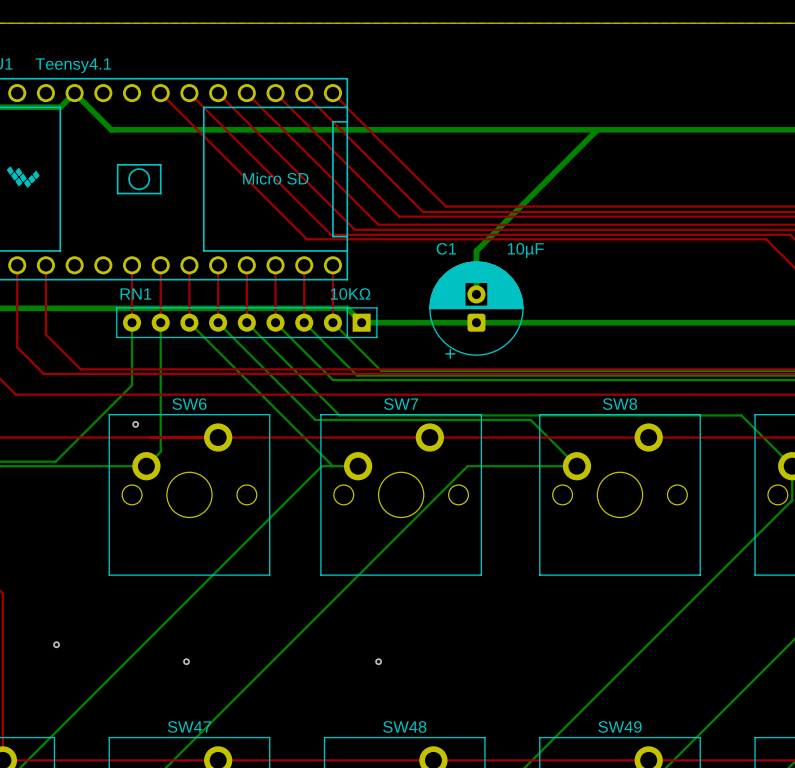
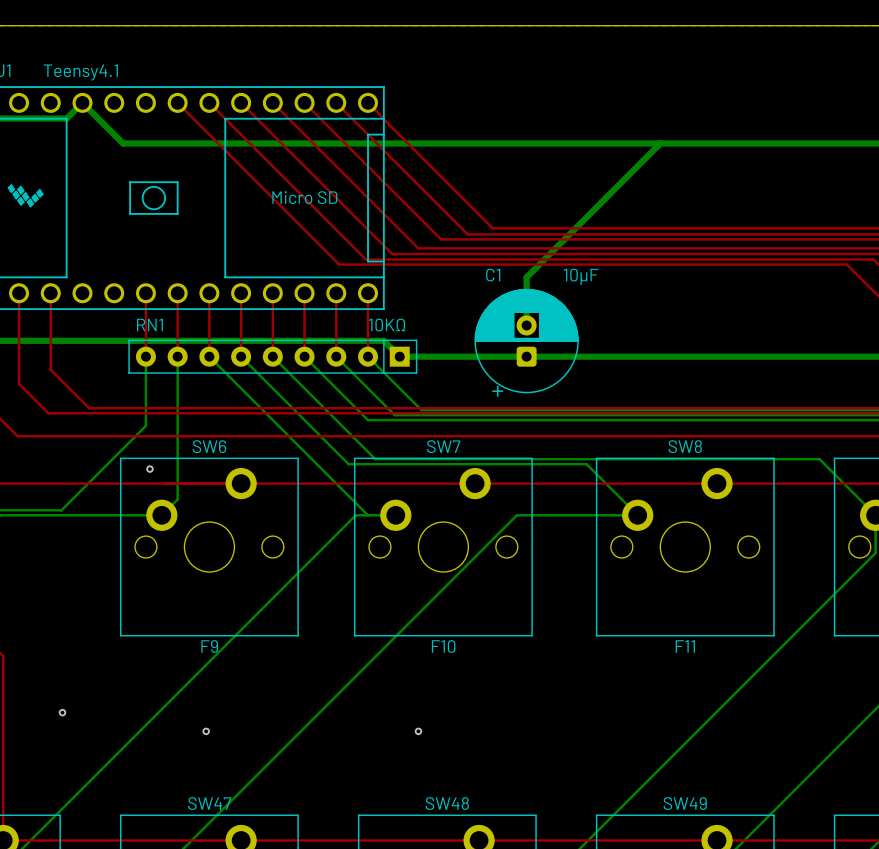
SW6 value: none -> F9 (209, 646)
SW7 value: none -> F10 (443, 646)
SW8 value: none -> F11 (685, 646)

